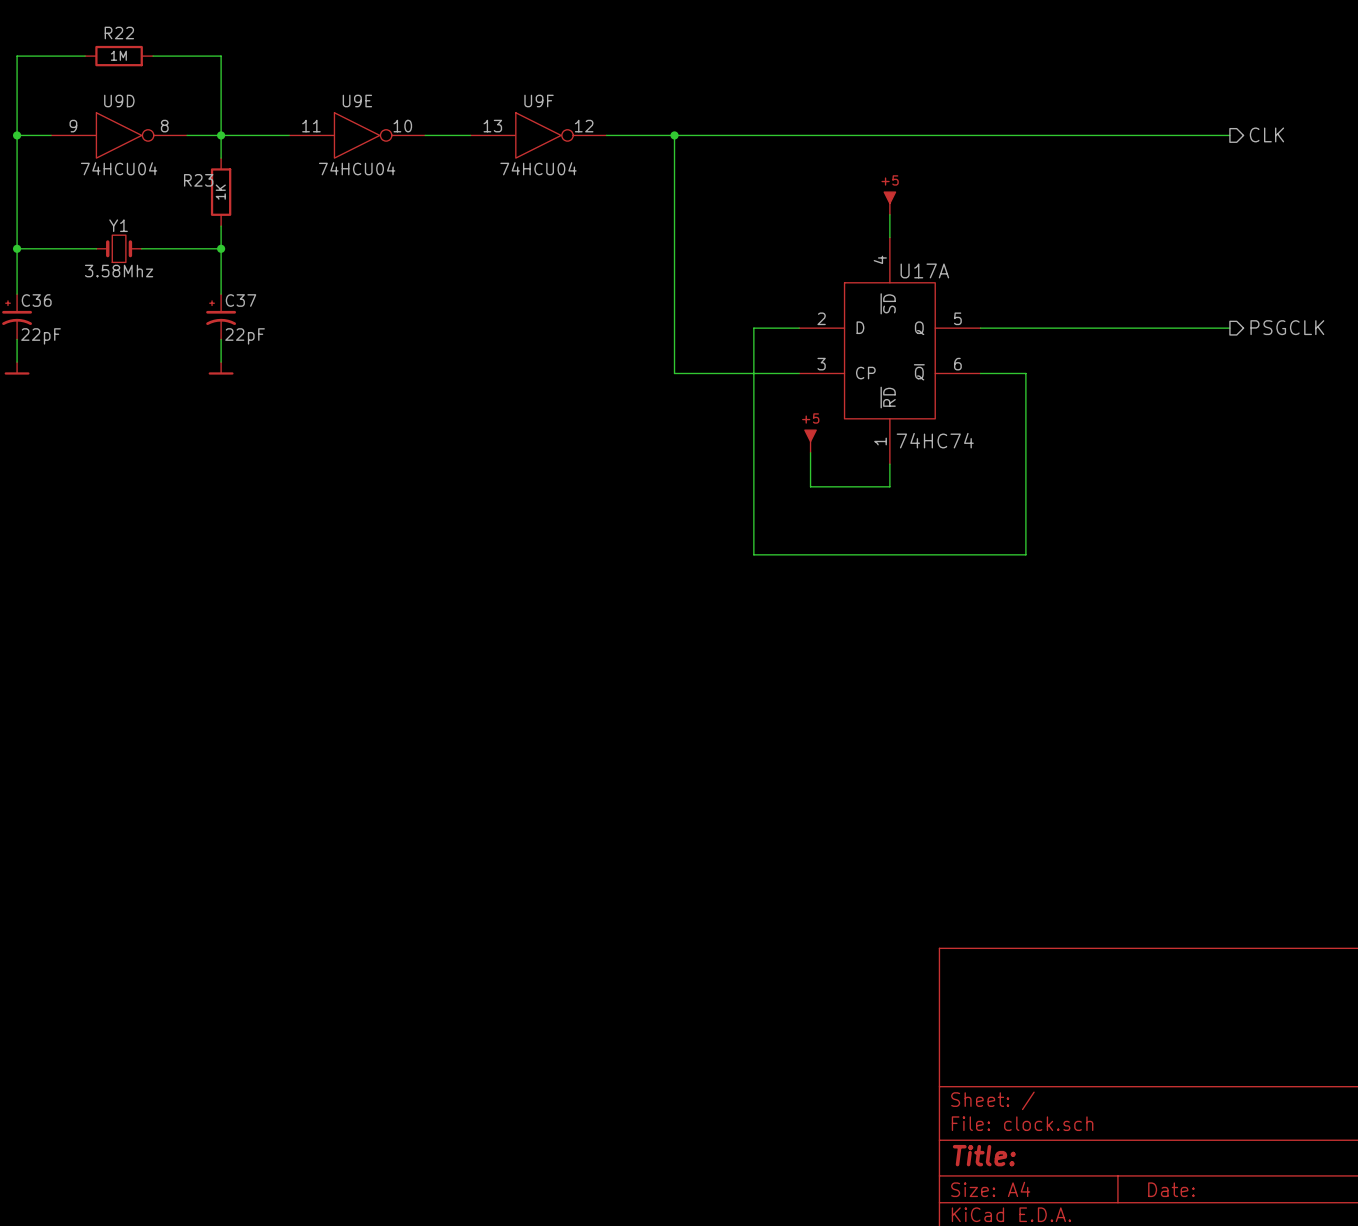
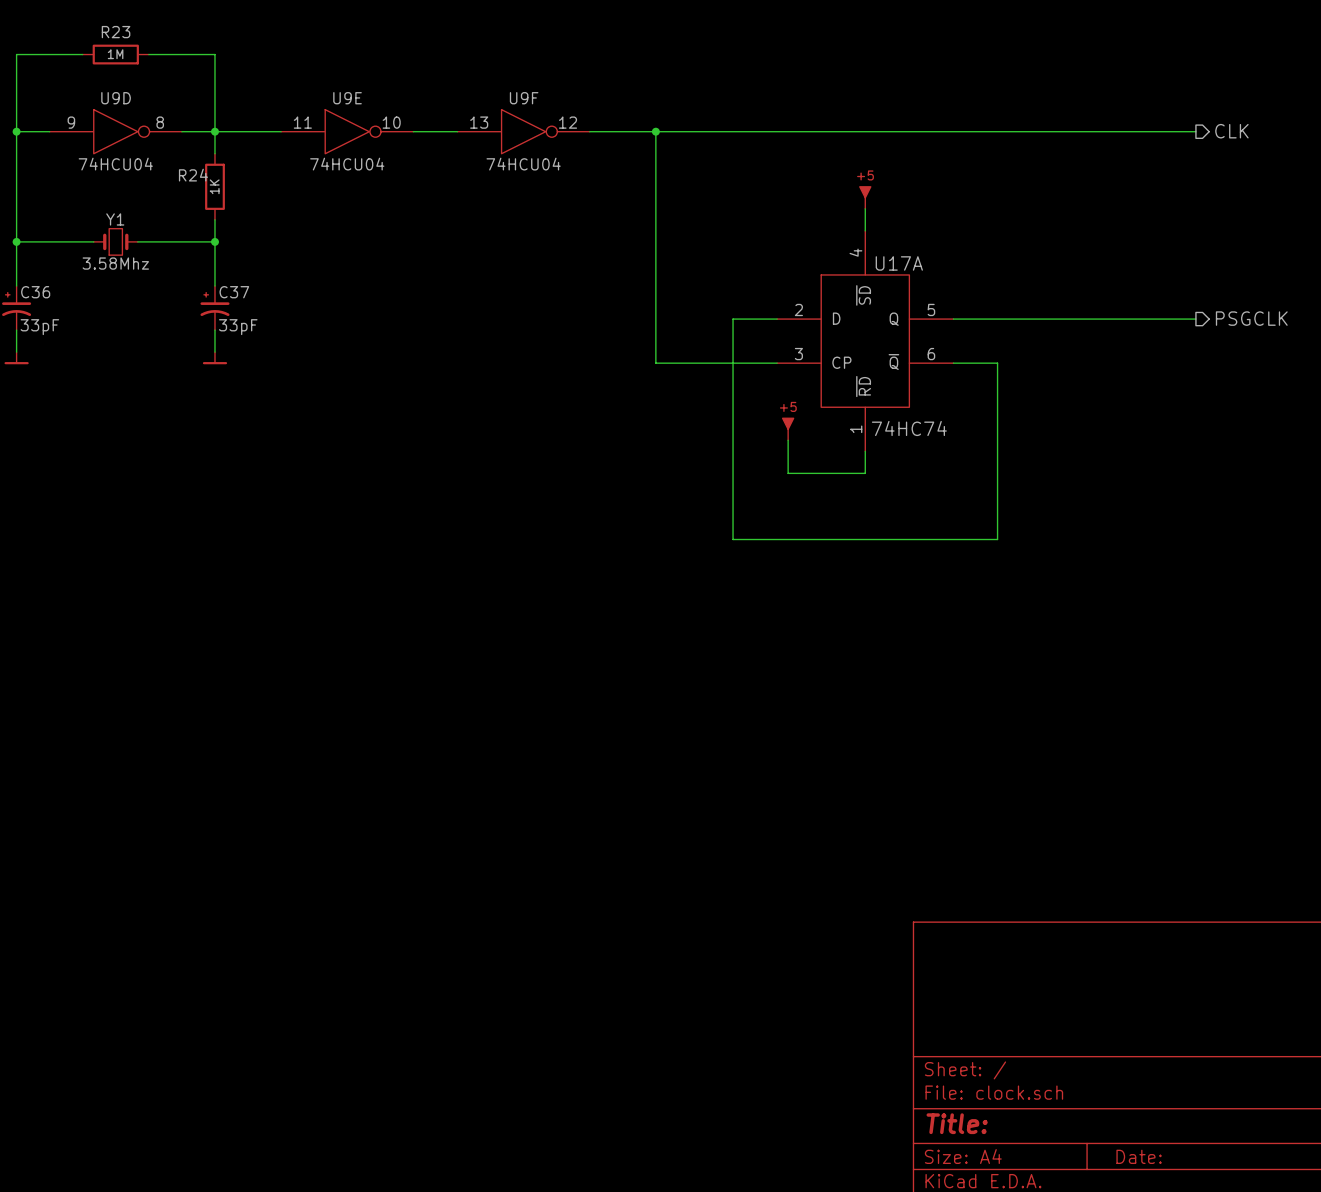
R22 name: R22 (119, 33) -> R23 (116, 32)
R23 name: R23 (198, 180) -> R24 (193, 175)
C36 value: 22pF (41, 336) -> 33pF (39, 327)
C37 value: 22pF (245, 336) -> 33pF (238, 327)

